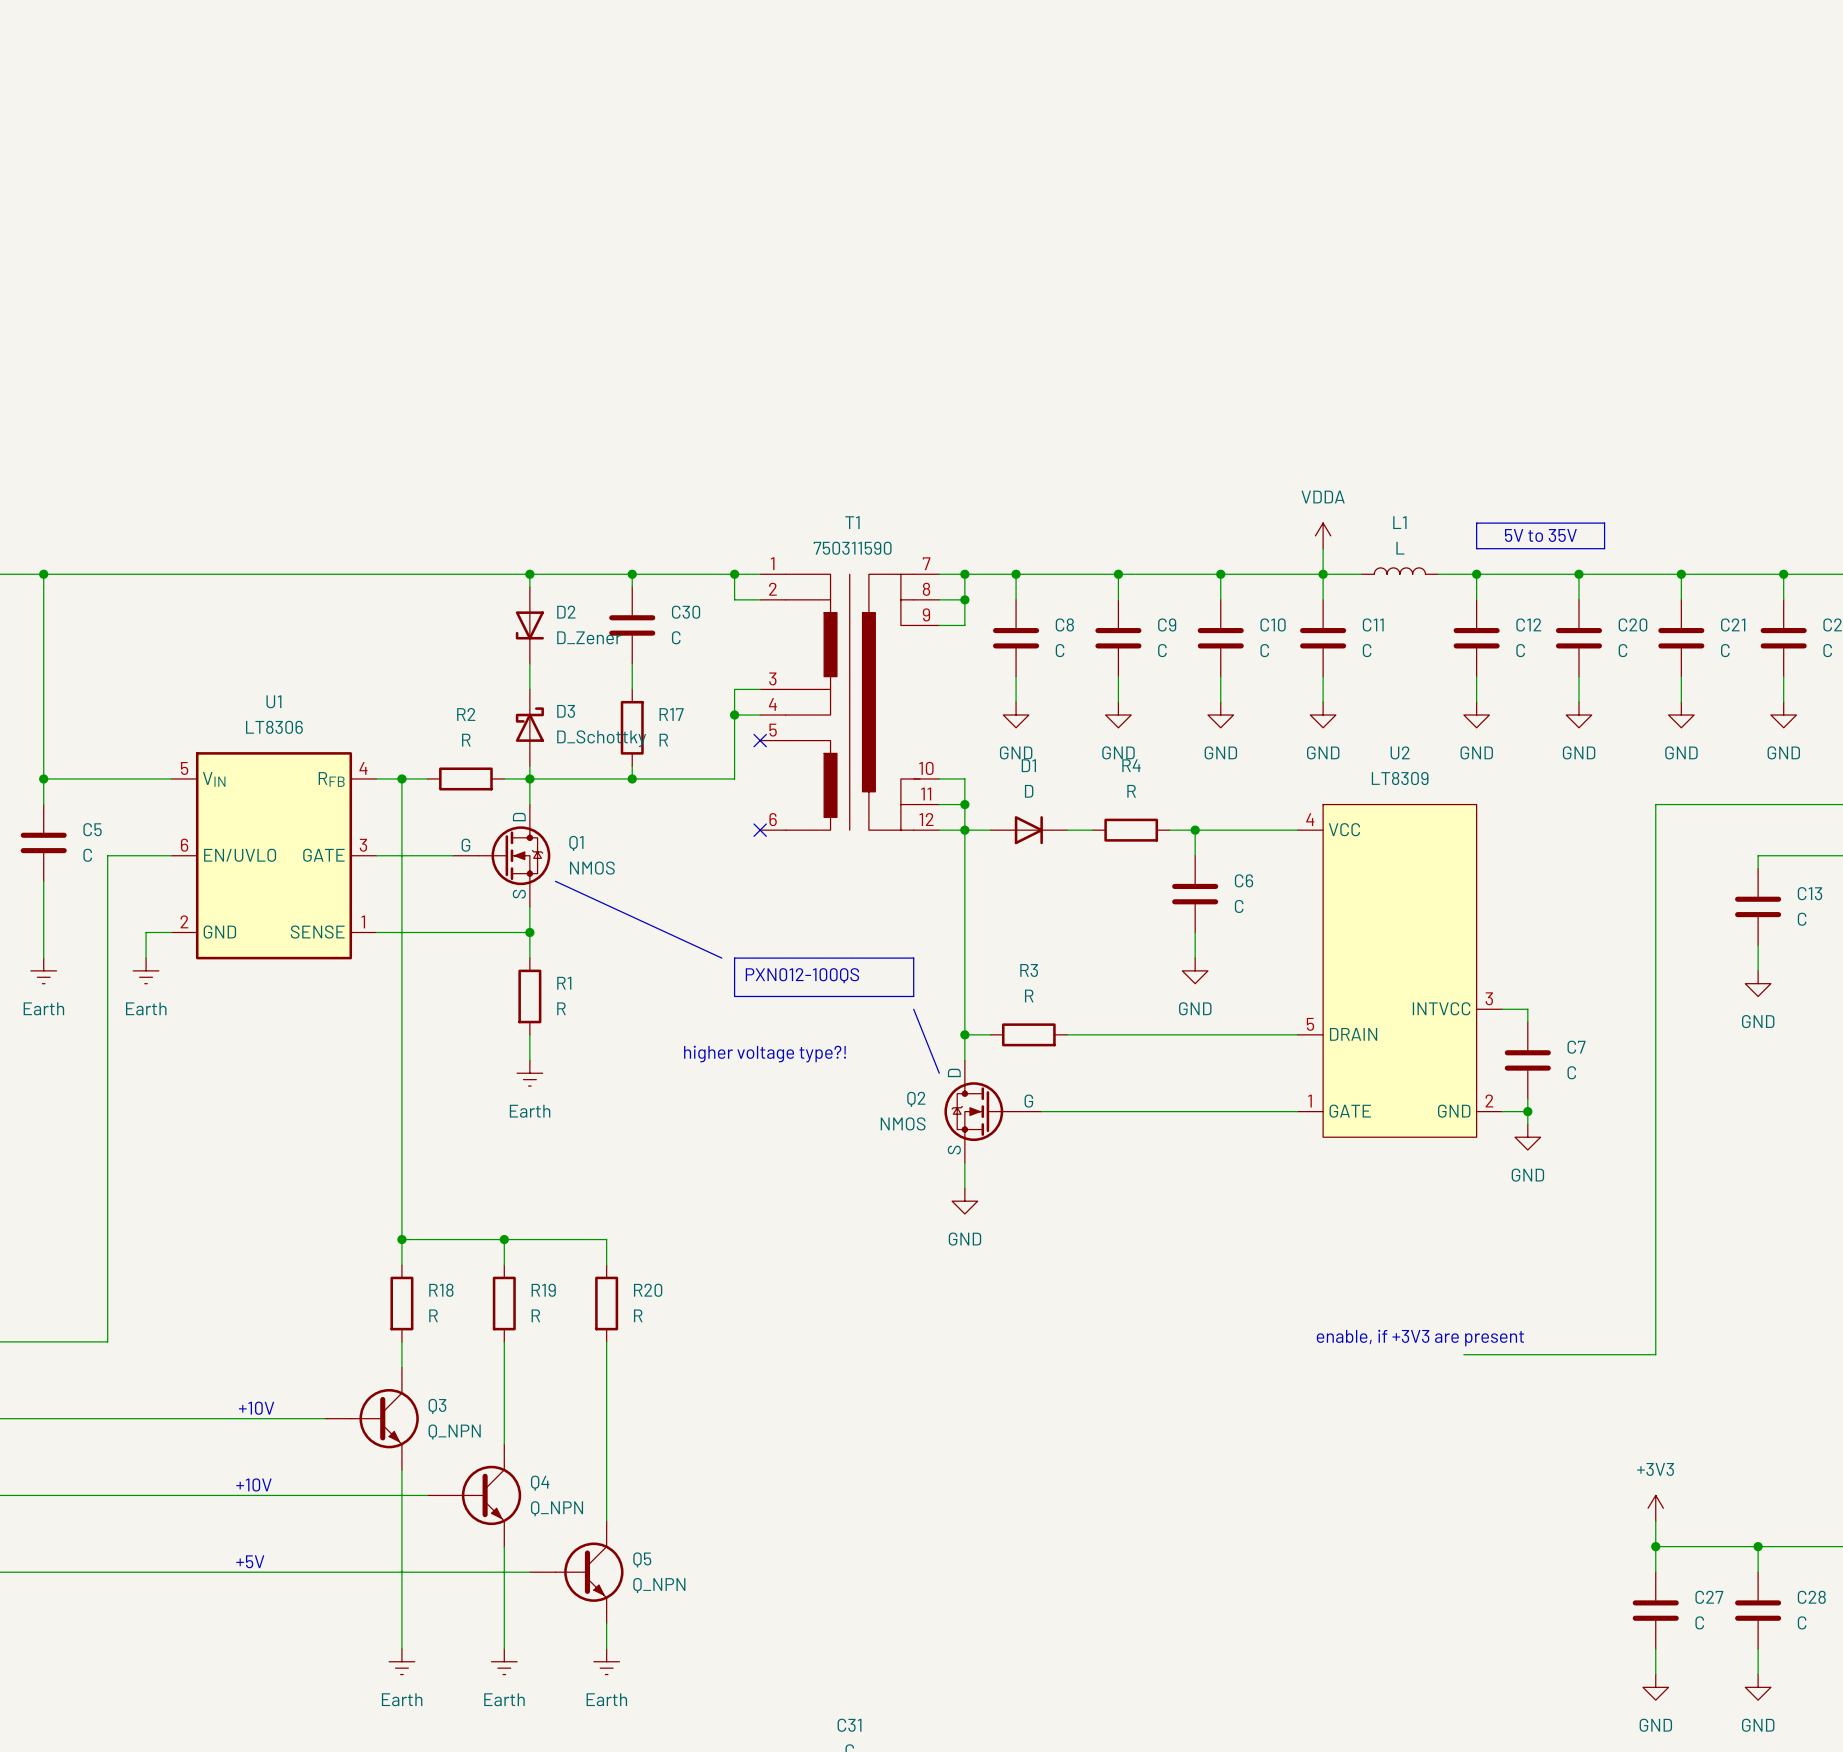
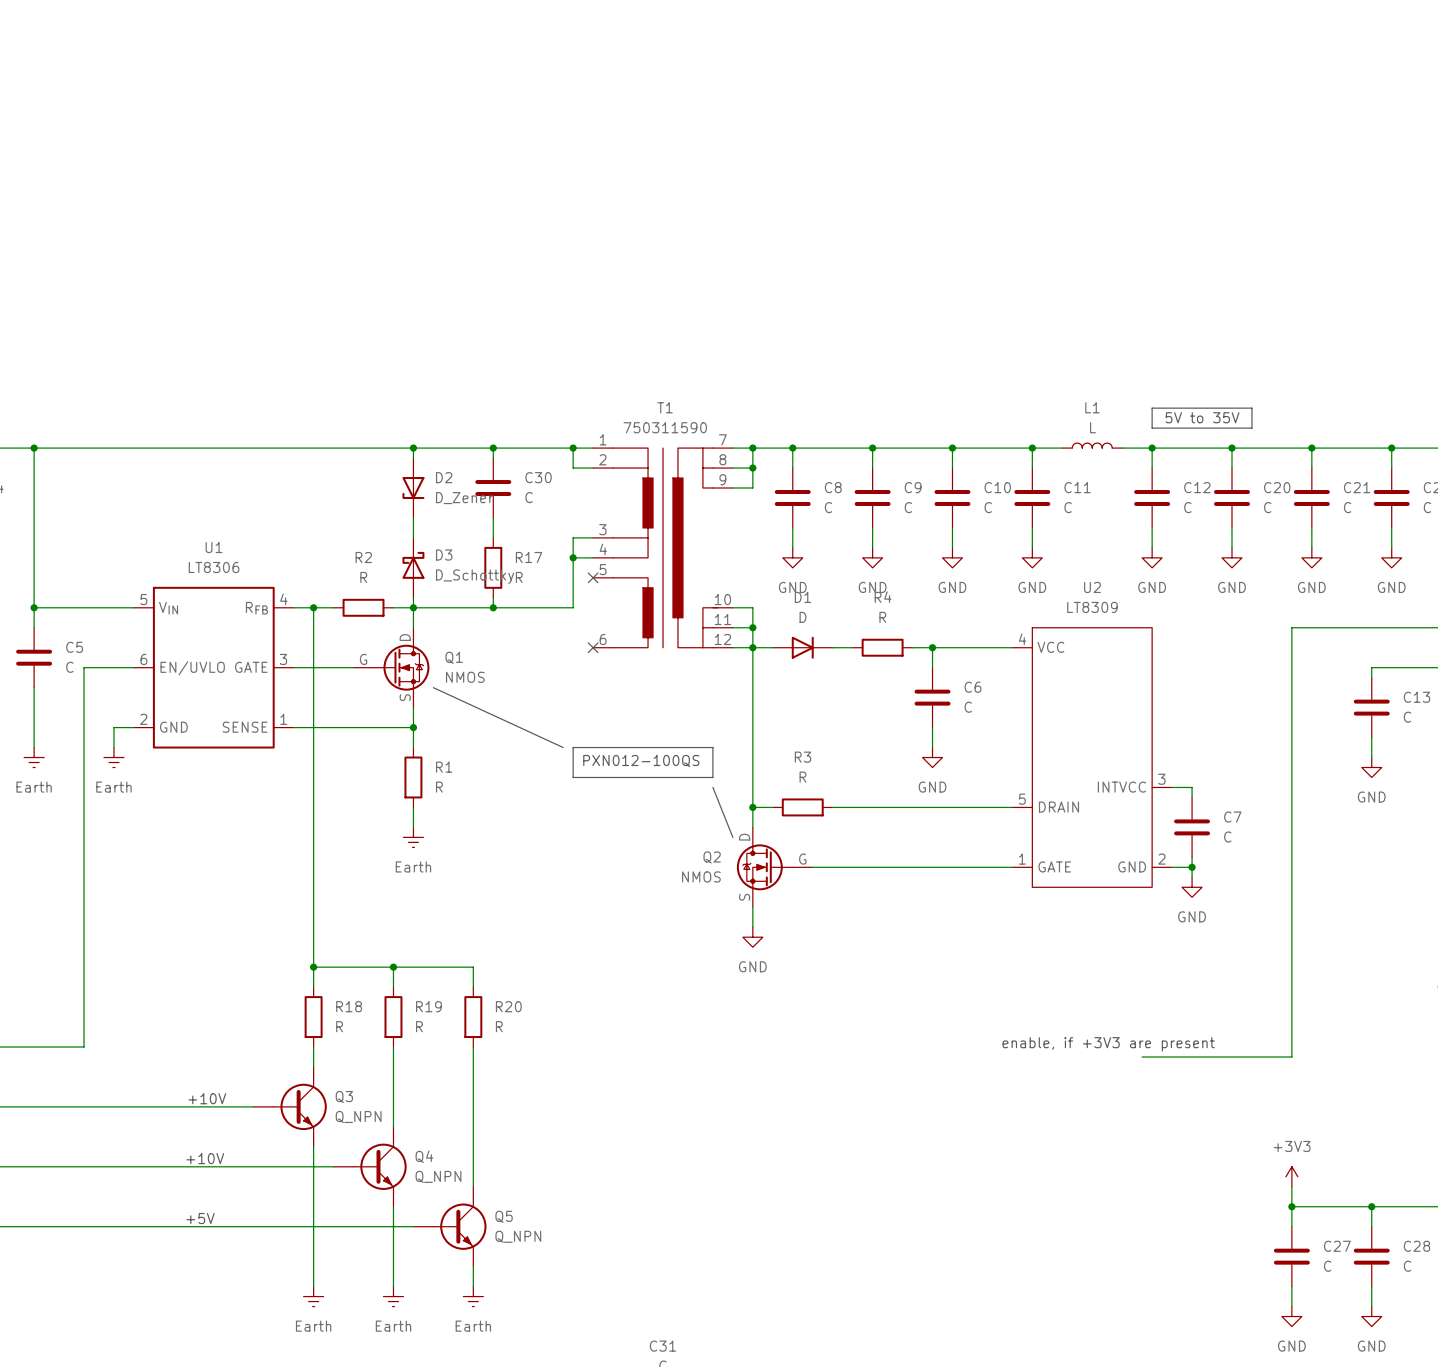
power symbol: VDDA (1323, 535) -> none
wire: (1323, 548) (1323, 574) -> none
text: higher voltage type?! (765, 1054) -> none

